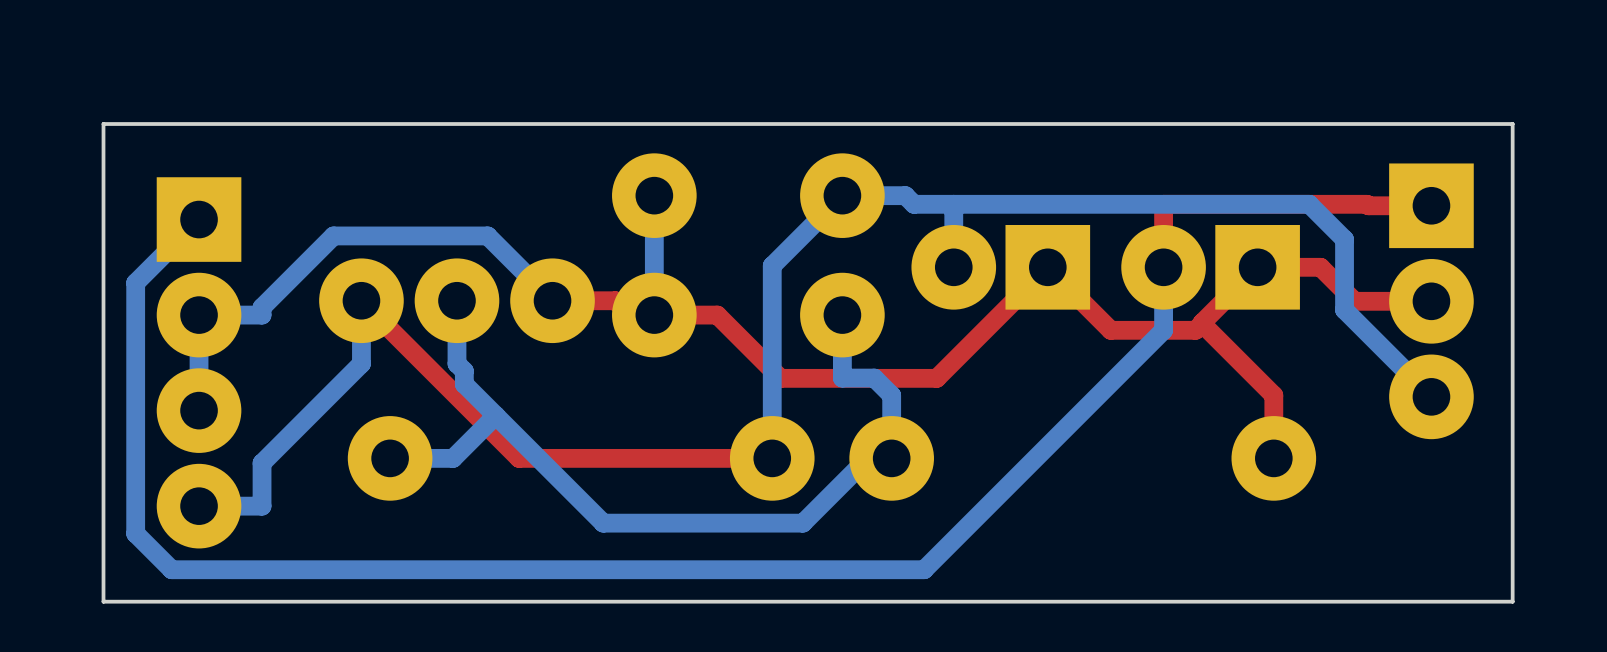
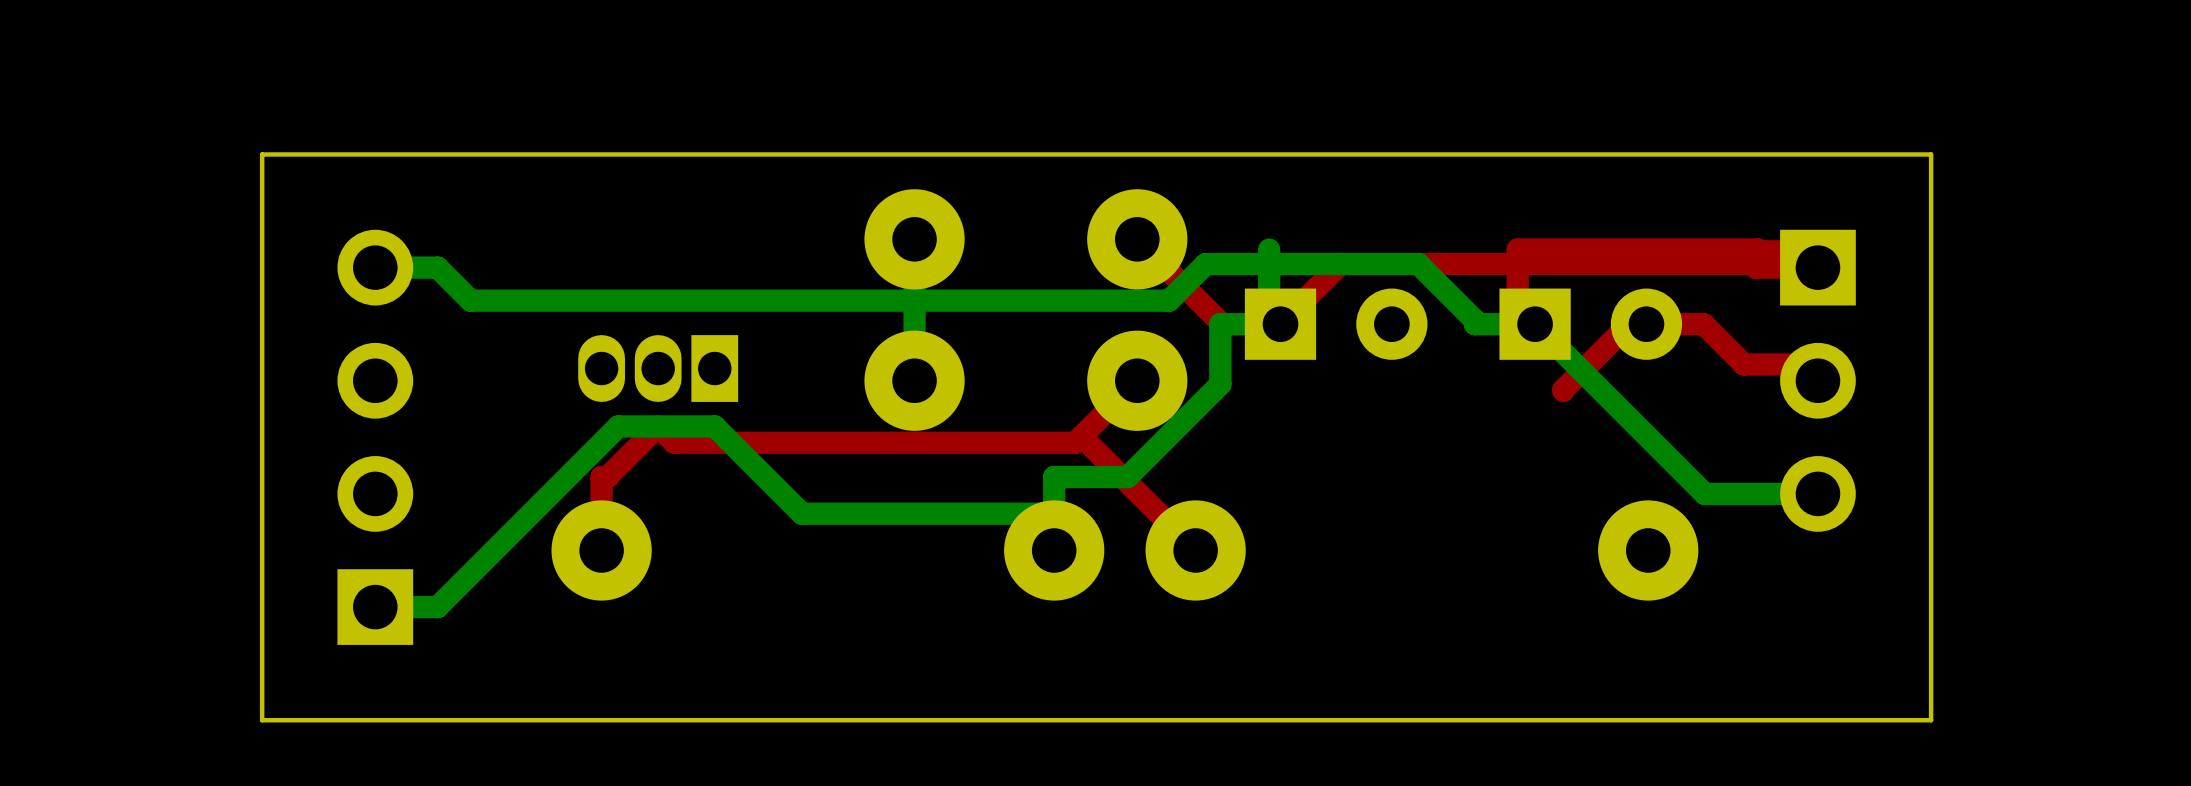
part footprint: [1389, 163, 1474, 440] -> [1780, 229, 1856, 532]
part footprint: [156, 177, 242, 549] -> [337, 229, 414, 645]
top track: none -> (1137, 239) (1220, 324) (1280, 324) (1340, 263) (1751, 263) (1755, 267) (1817, 267)
bottom track: (199, 219) (135, 282) (135, 533) (171, 569) (924, 569) (1163, 330) (1163, 267) -> (375, 267) (437, 267) (470, 300) (1169, 300) (1205, 264) (1418, 264) (1474, 320) (1474, 324) (1535, 324) (1704, 493) (1817, 493)
part footprint: [911, 225, 1091, 310] -> [1244, 288, 1428, 360]
part footprint: [1121, 225, 1300, 310] -> [1499, 288, 1683, 360]
part footprint: [319, 258, 595, 344] -> [578, 335, 739, 402]
top track: (361, 300) (519, 458) (772, 458) -> none
bottom track: (361, 300) (361, 363) (262, 463) (262, 506) (251, 506) -> (1054, 513) (802, 513) (714, 426) (618, 426) (437, 607)
bottom track: (456, 300) (456, 363) (464, 371) (464, 384) (603, 523) (802, 523) (891, 434) -> none
top track: (552, 300) (615, 300) (629, 315) (717, 315) (780, 378) (936, 378) (1047, 267) (1110, 330) (1195, 330) (1202, 323) (1273, 395) (1273, 458) -> none
bottom track: (552, 300) (487, 235) (333, 235) (262, 307) (262, 315) (199, 315) (199, 410) -> none
top track: none -> (1137, 380) (1075, 442) (674, 442) (658, 426) (607, 476) (601, 476) (601, 550)
bottom track: (842, 315) (842, 378) (874, 378) (891, 395) (891, 458) -> none
top track: none -> (1081, 436) (1195, 550)
bottom track: (772, 396) (772, 265) (842, 195) (905, 195) (914, 204) (1309, 204) (1344, 239) (1344, 309) (1431, 396) -> (1054, 476) (1127, 476) (1220, 384) (1220, 324) (1280, 324)
bottom track: (495, 415) (453, 458) (390, 458) -> none

